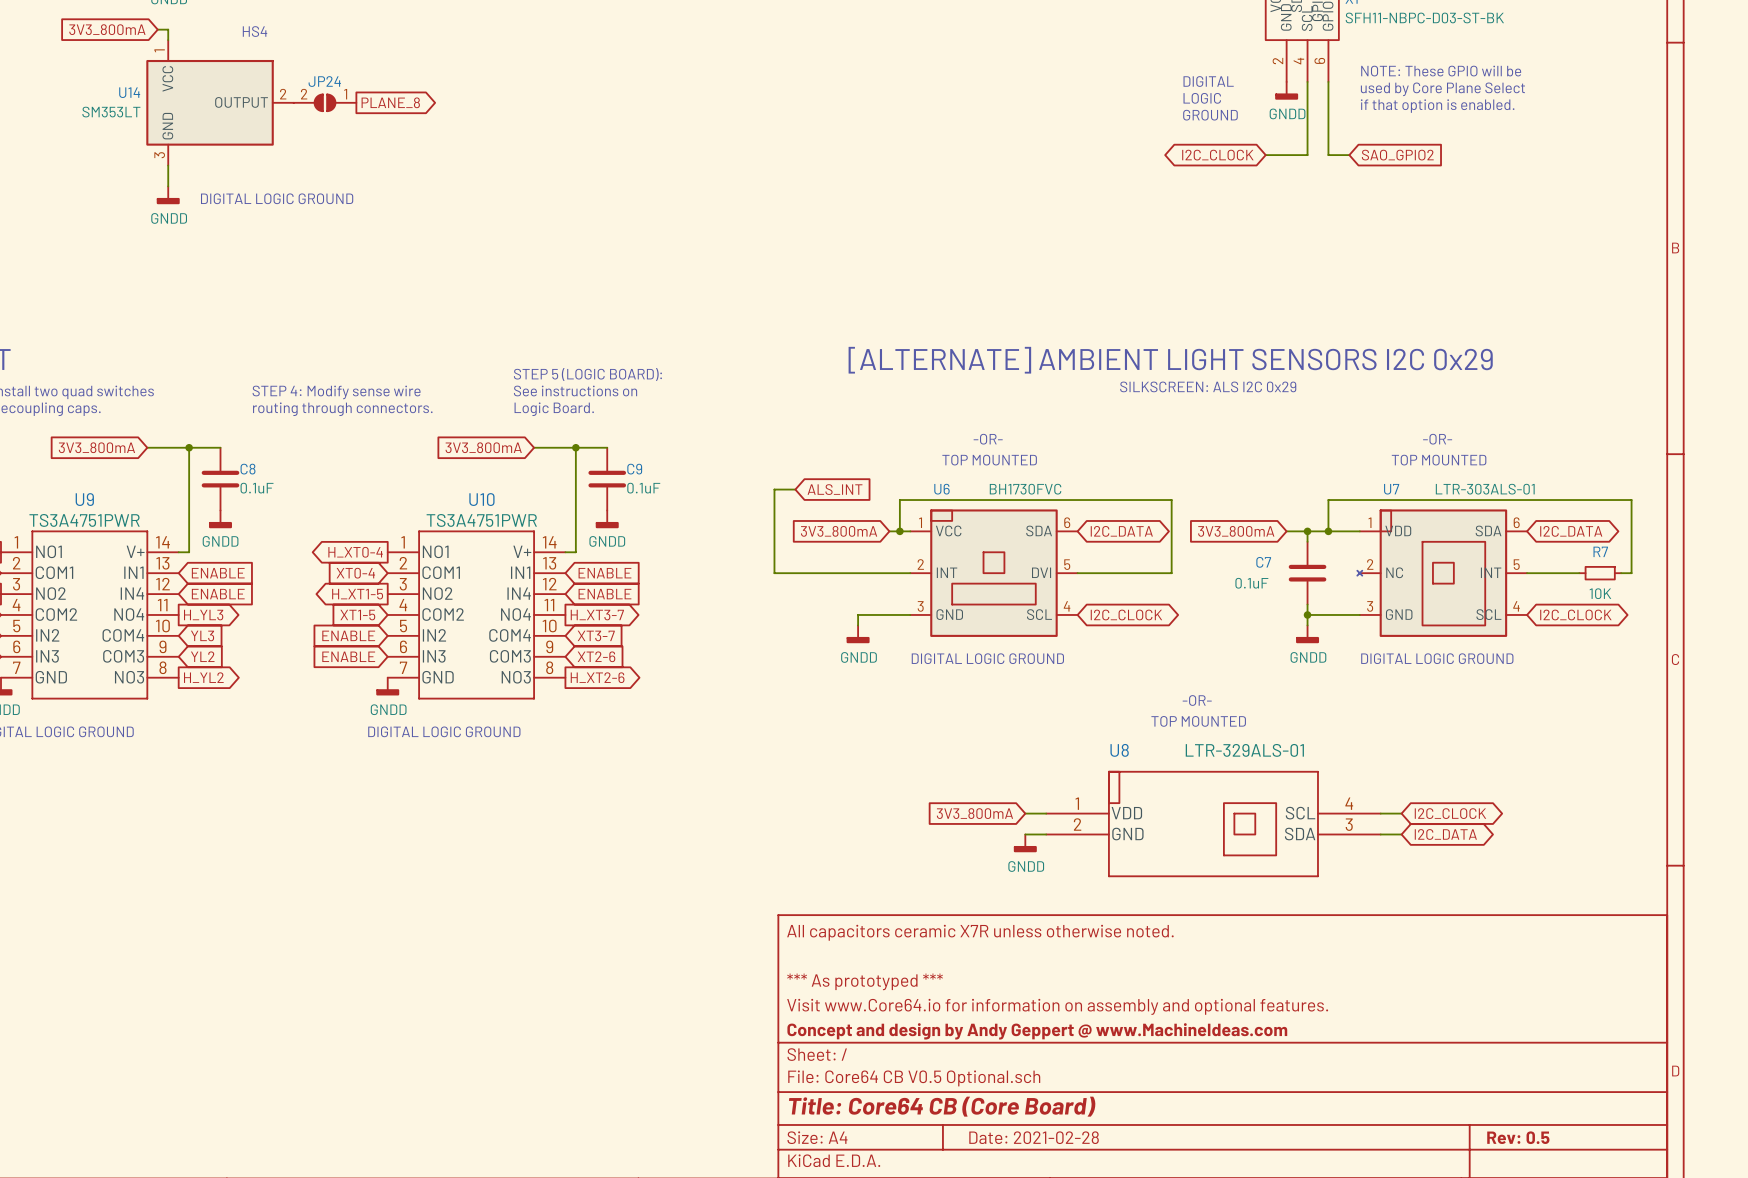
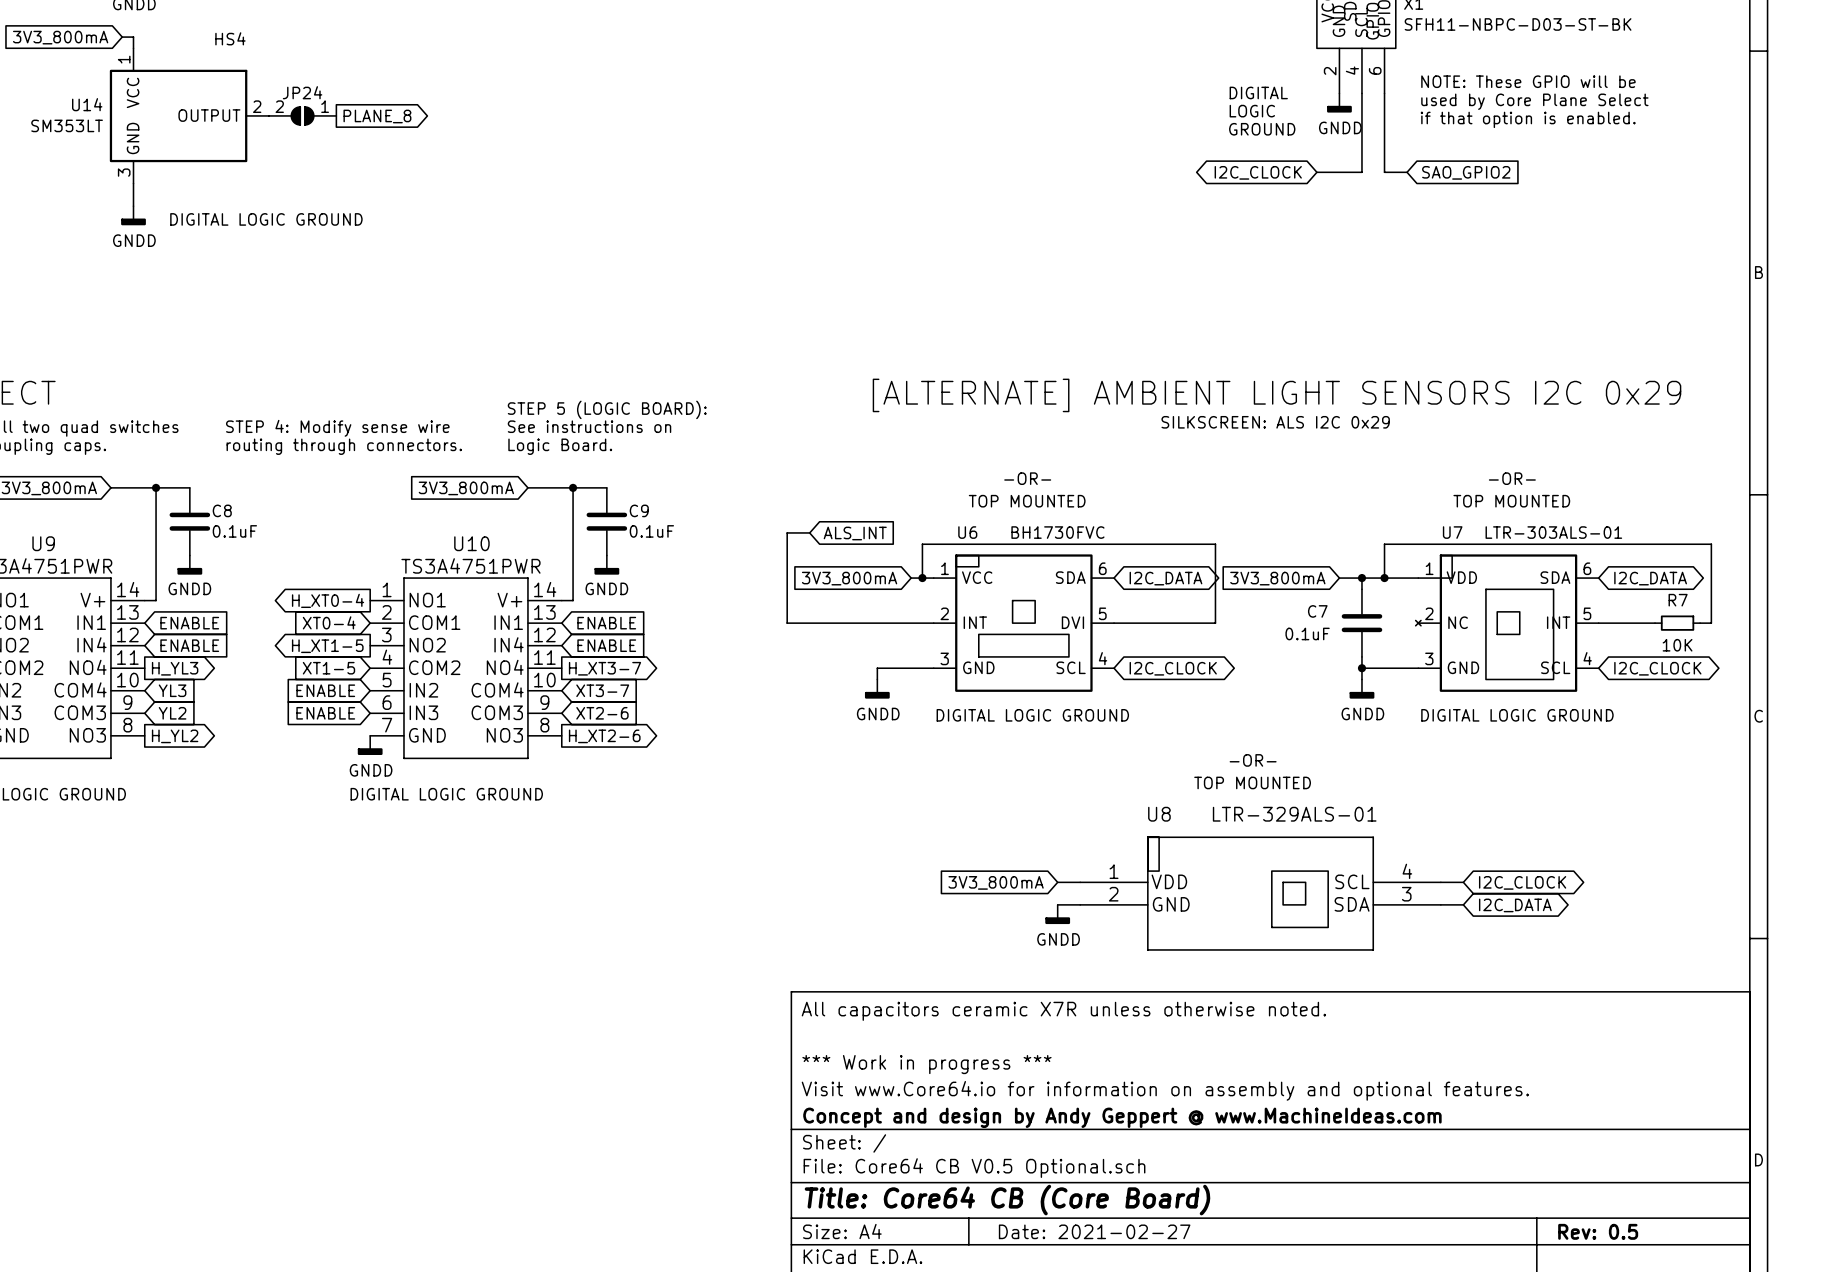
title block: *** As prototyped *** (865, 981) -> *** Work in progress *** (926, 1064)
title block: Date: 2021-02-28 (1034, 1137) -> Date: 2021-02-27 (1094, 1231)

